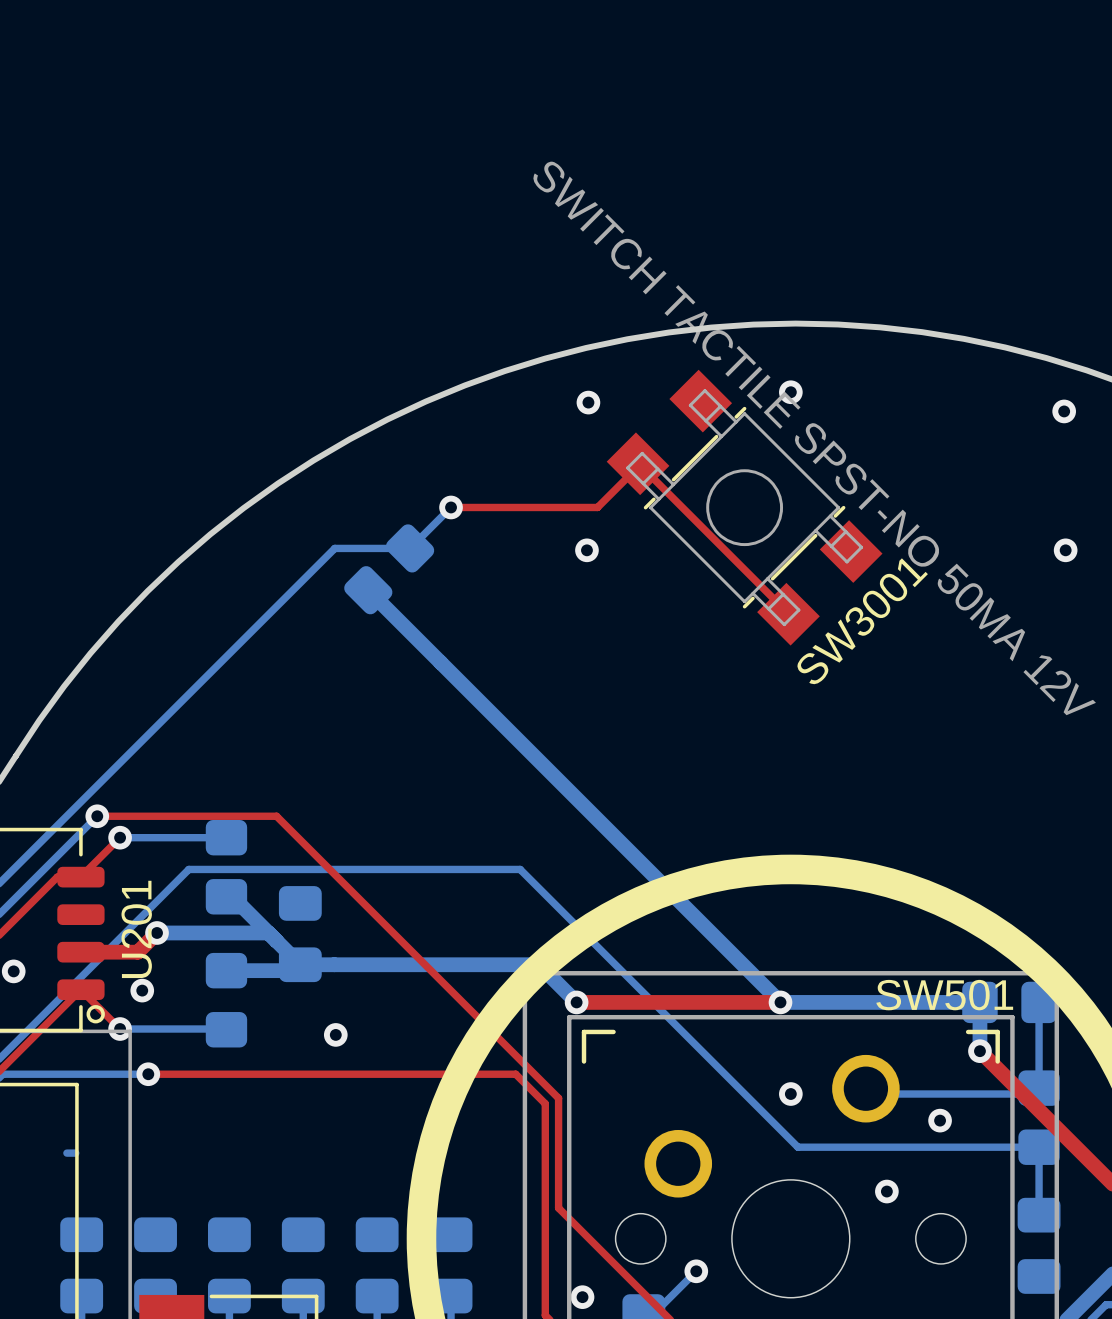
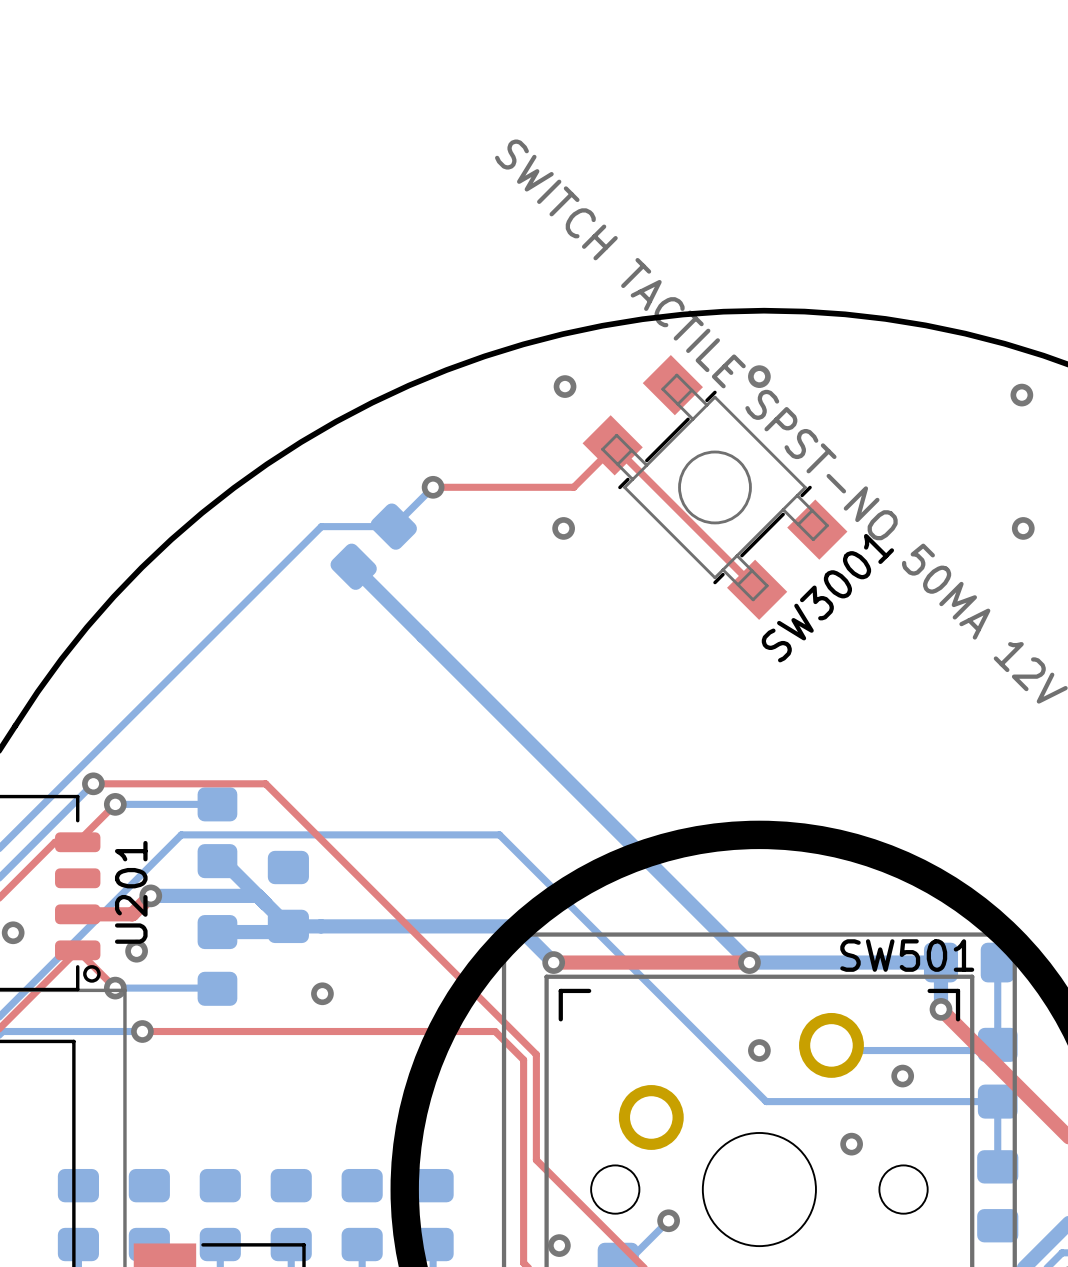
bottom track: (66, 1153) (75, 1153) -> none

